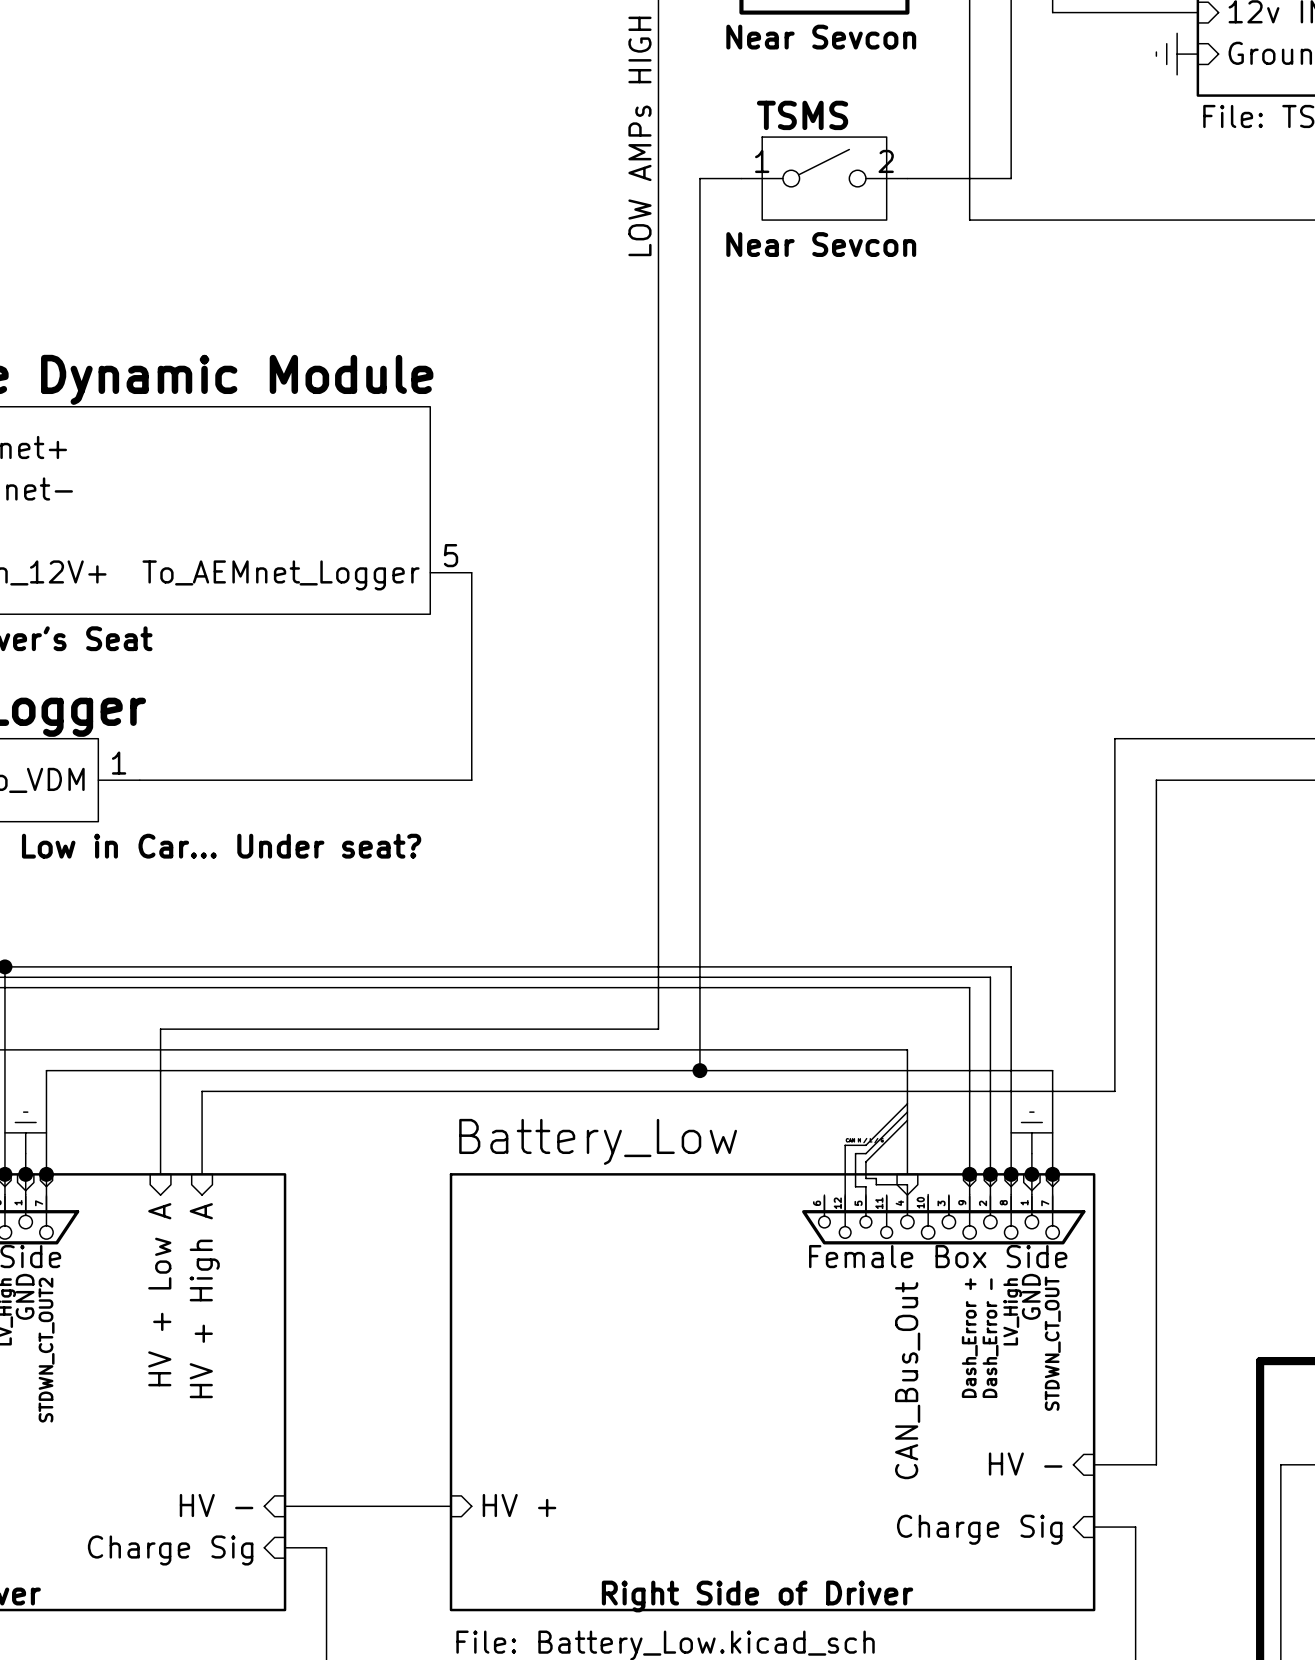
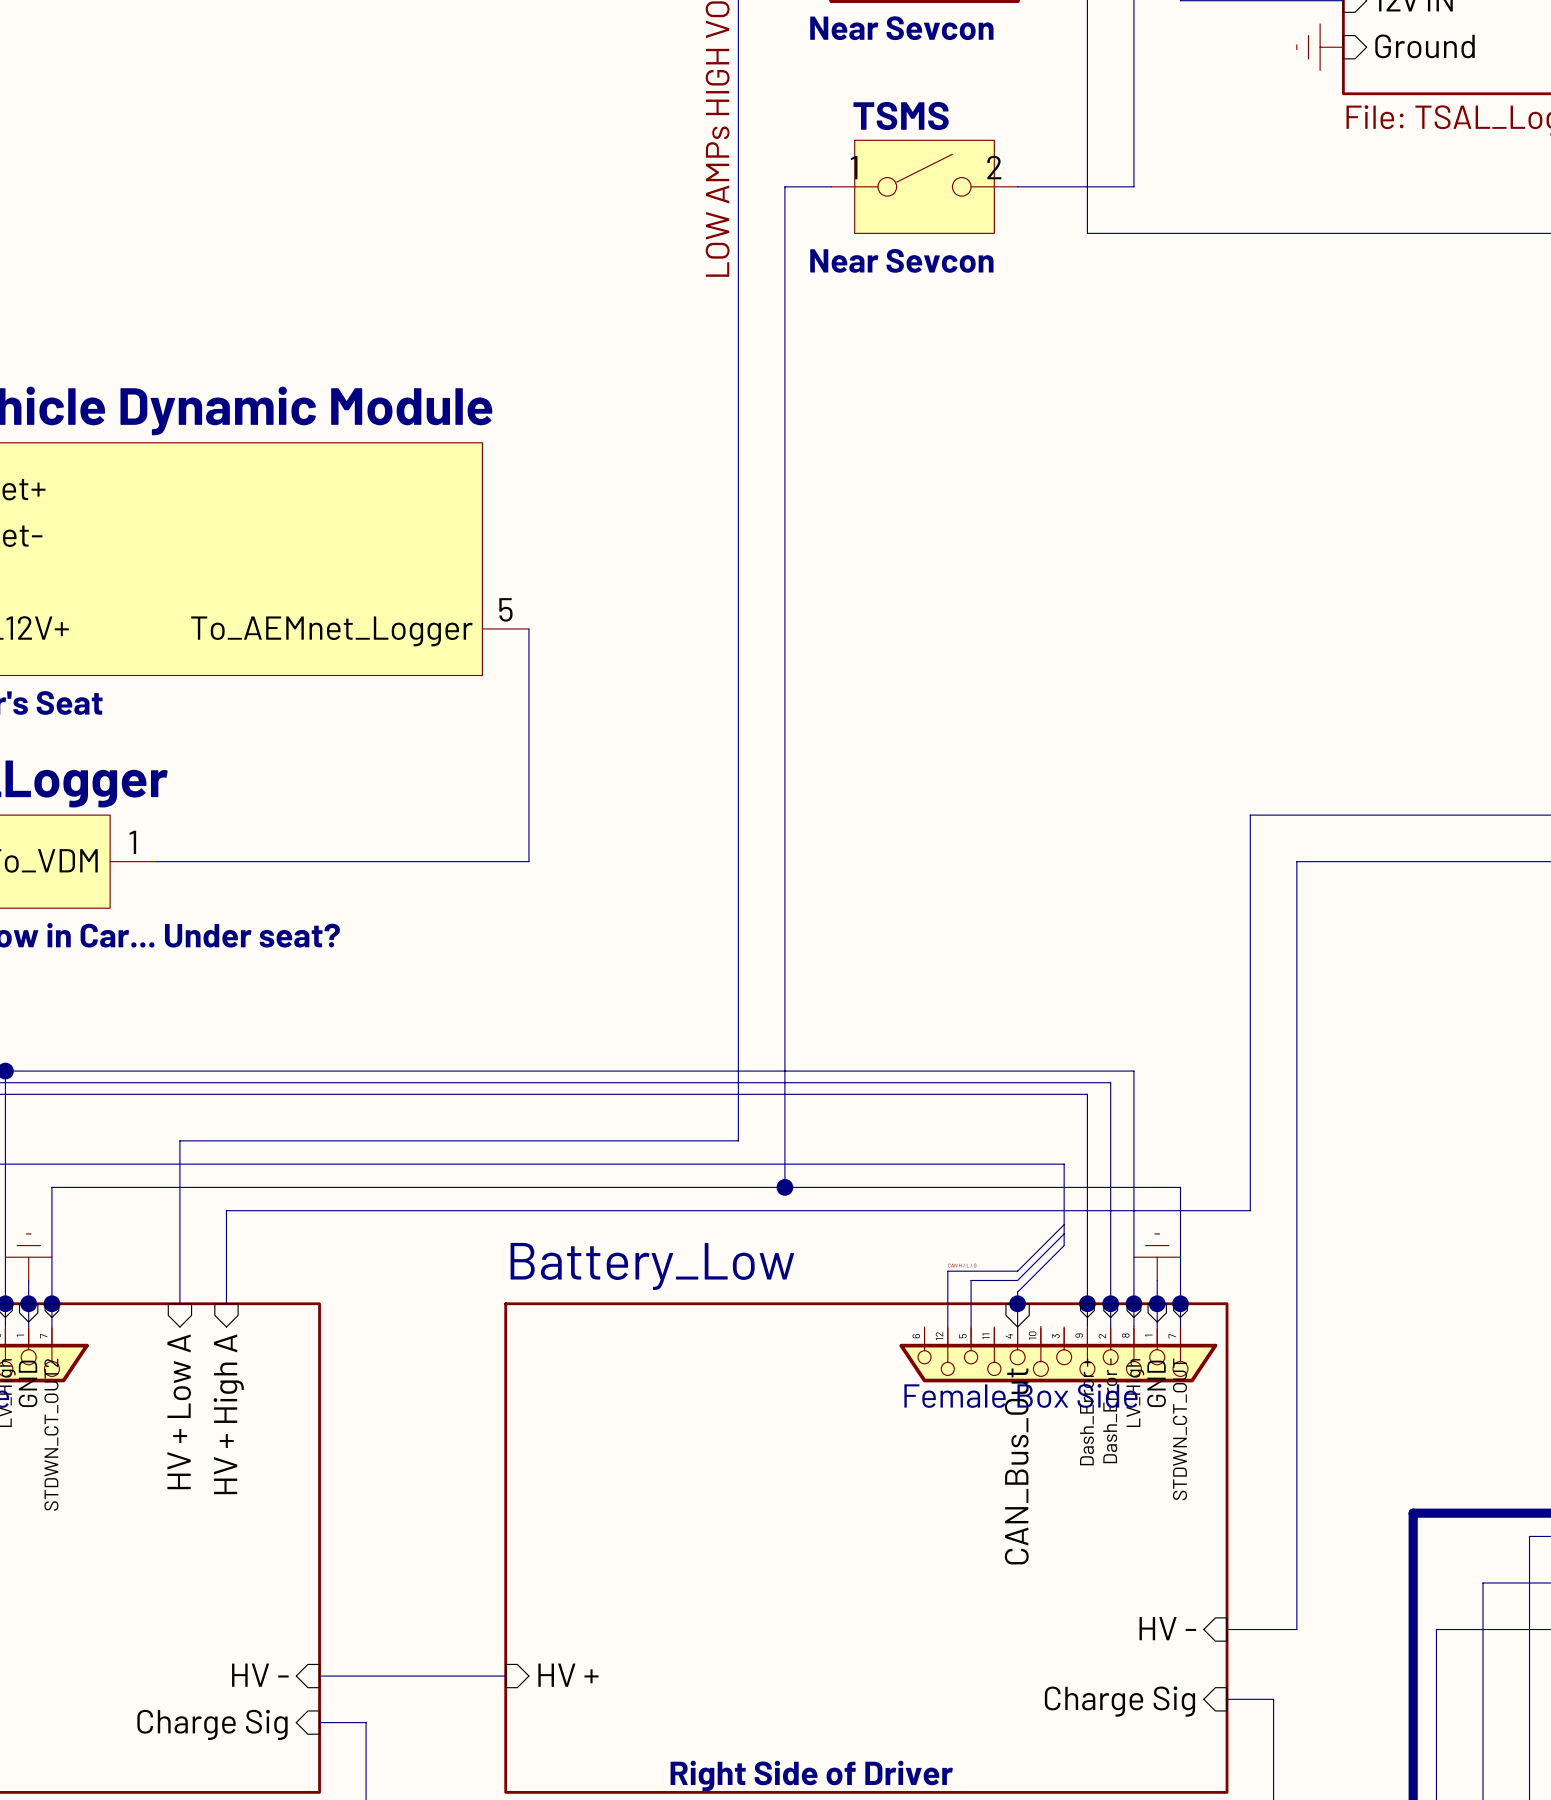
bus: (907, 1049) (907, 1174) -> (1017, 1164) (1064, 1164) (1064, 1245)
wire: (907, 1103) (865, 1145) -> (1064, 1224) (1017, 1271) (971, 1271)
wire: (907, 1112) (865, 1153) (855, 1153) (855, 1186) (865, 1186) -> none
wire: (907, 1120) (865, 1161) -> (1064, 1233) (1017, 1280) (971, 1280) (971, 1289)
wire: none -> (1064, 1245) (1017, 1292) (1017, 1315)
junction: none -> (1017, 1303)
wire: (865, 1178) (876, 1178) (876, 1184) (907, 1184) -> (971, 1308) (971, 1317)

